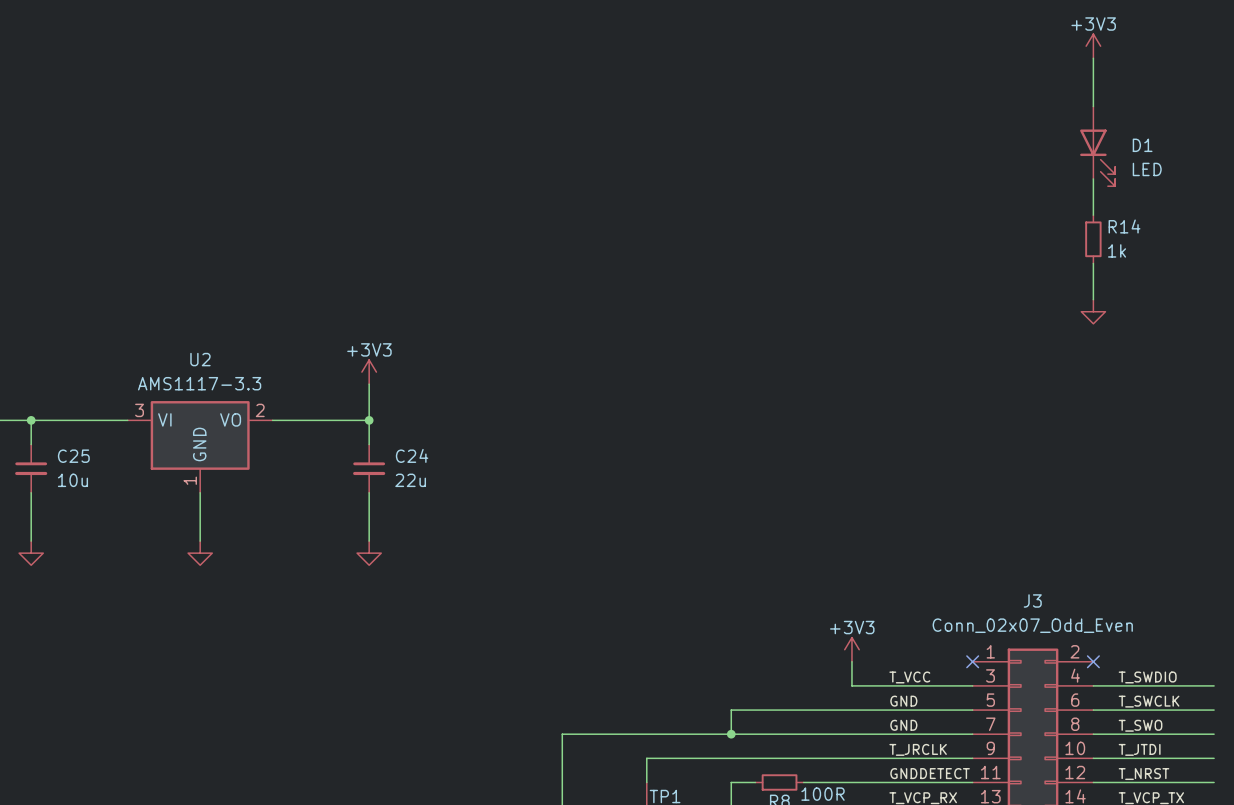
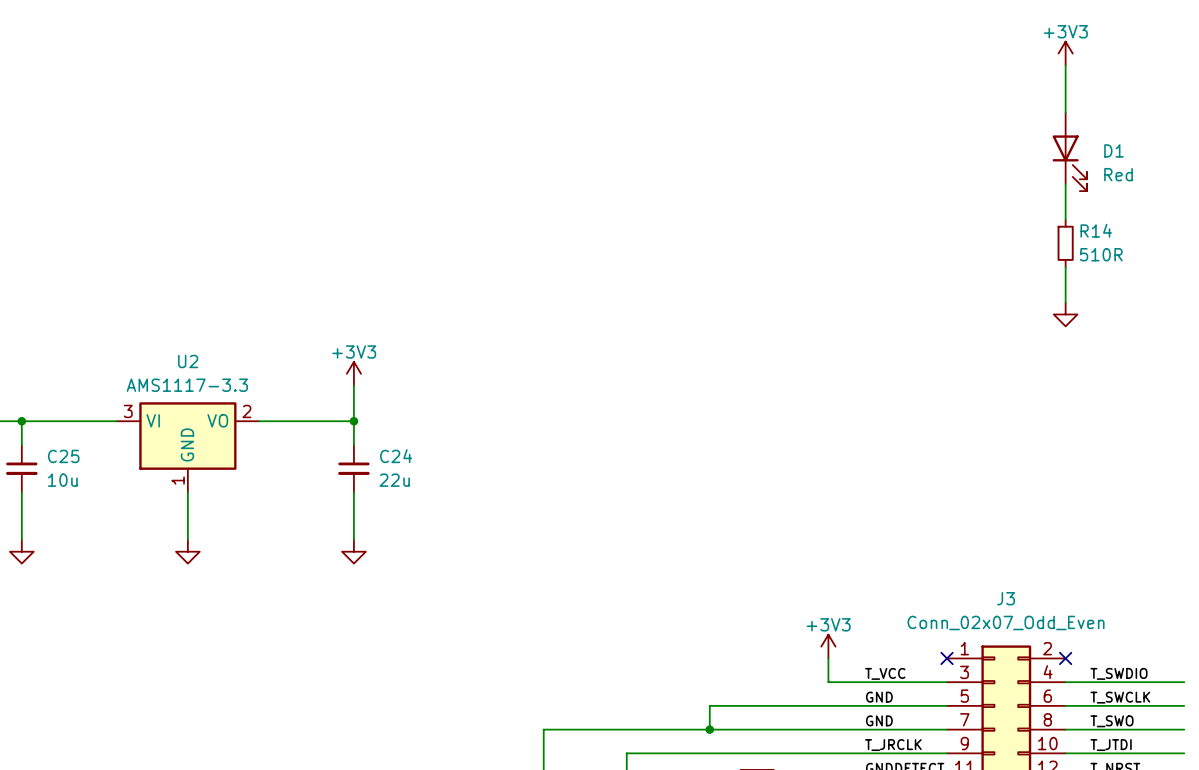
D1 value: LED (1147, 169) -> Red (1118, 174)
R14 value: 1k (1117, 250) -> 510R (1101, 254)

